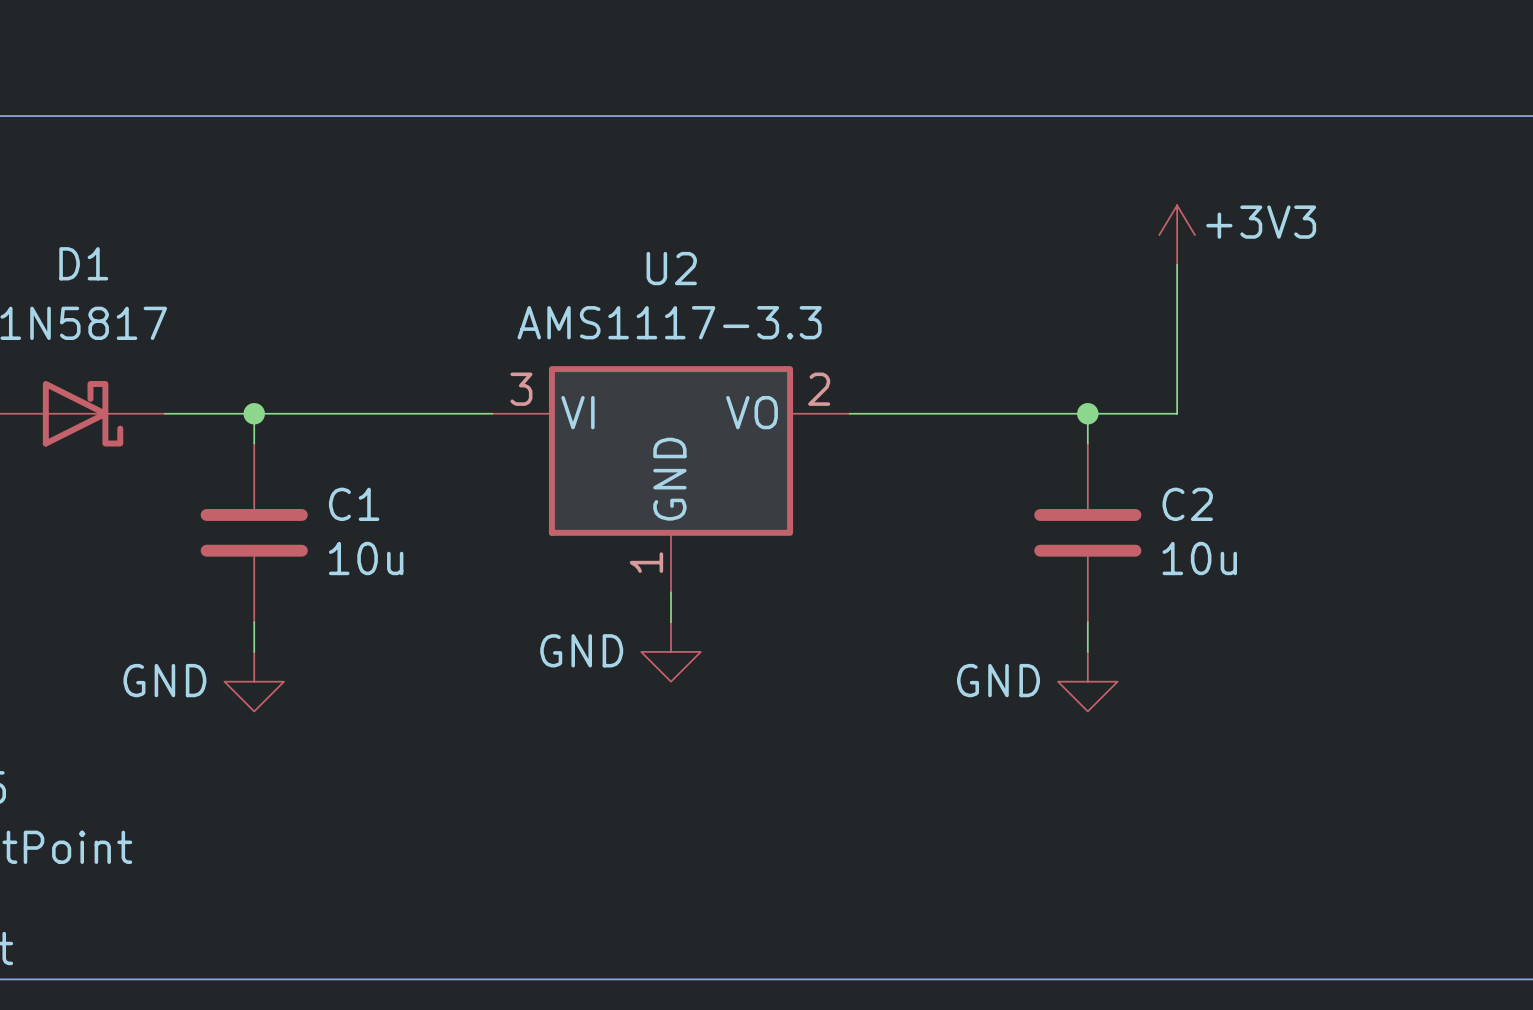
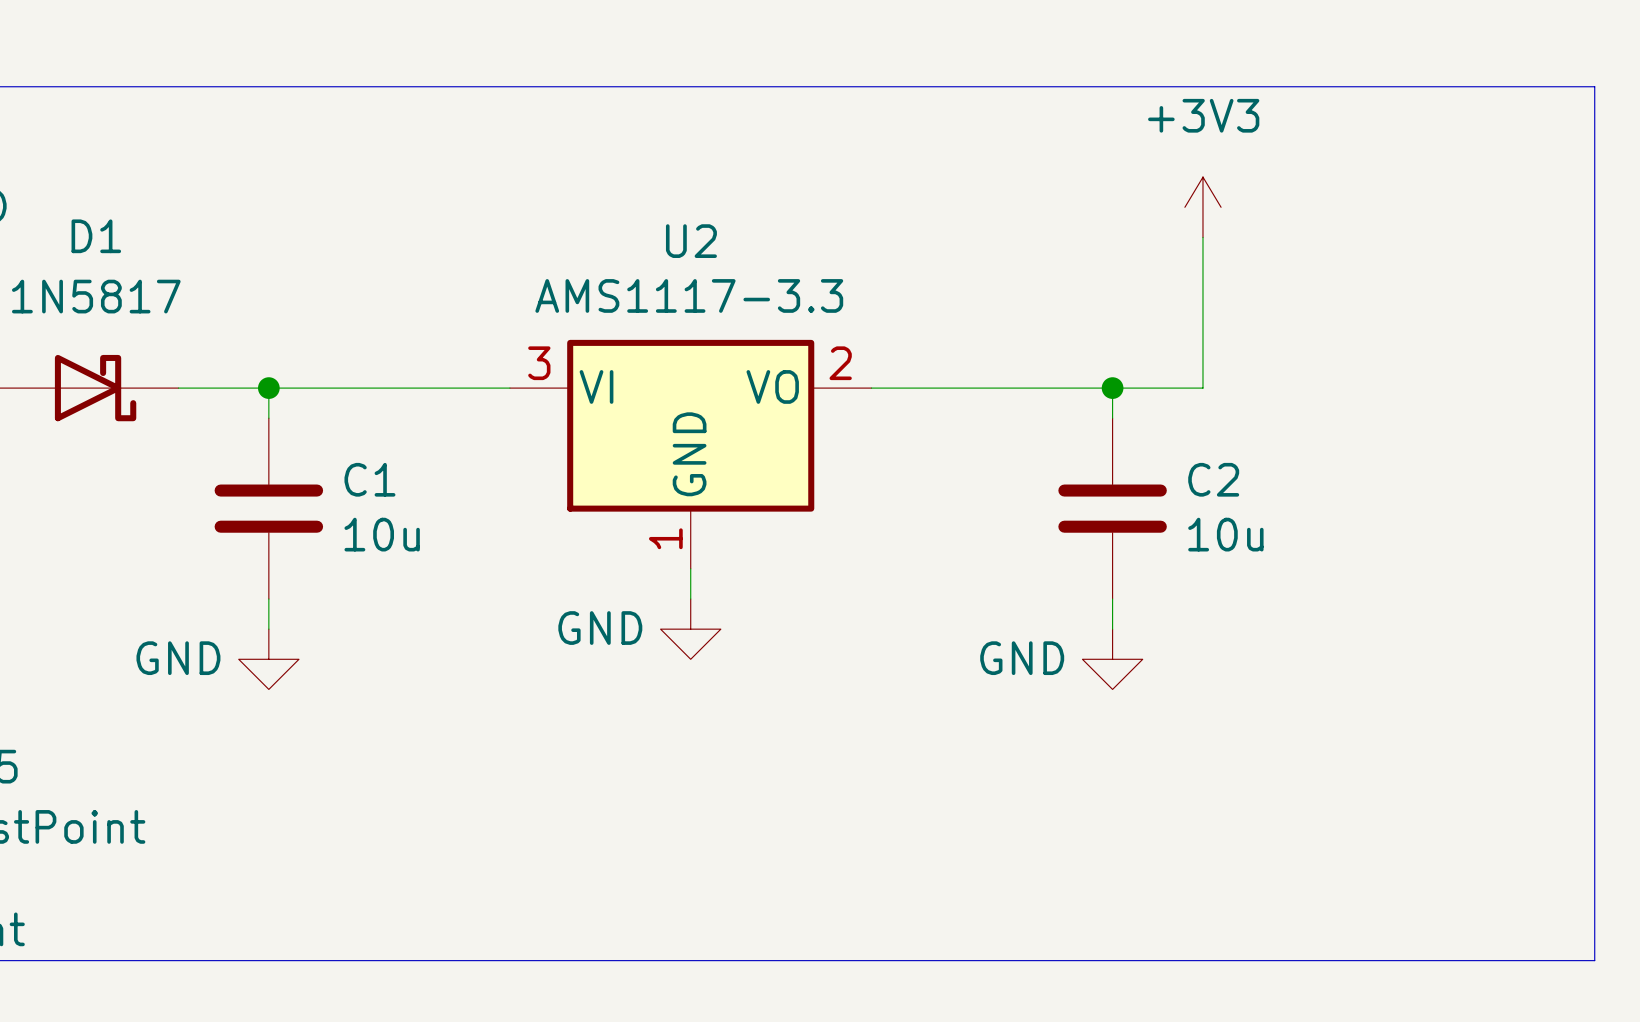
power symbol text position: +3V3 (1261, 222) -> +3V3 (1203, 115)

